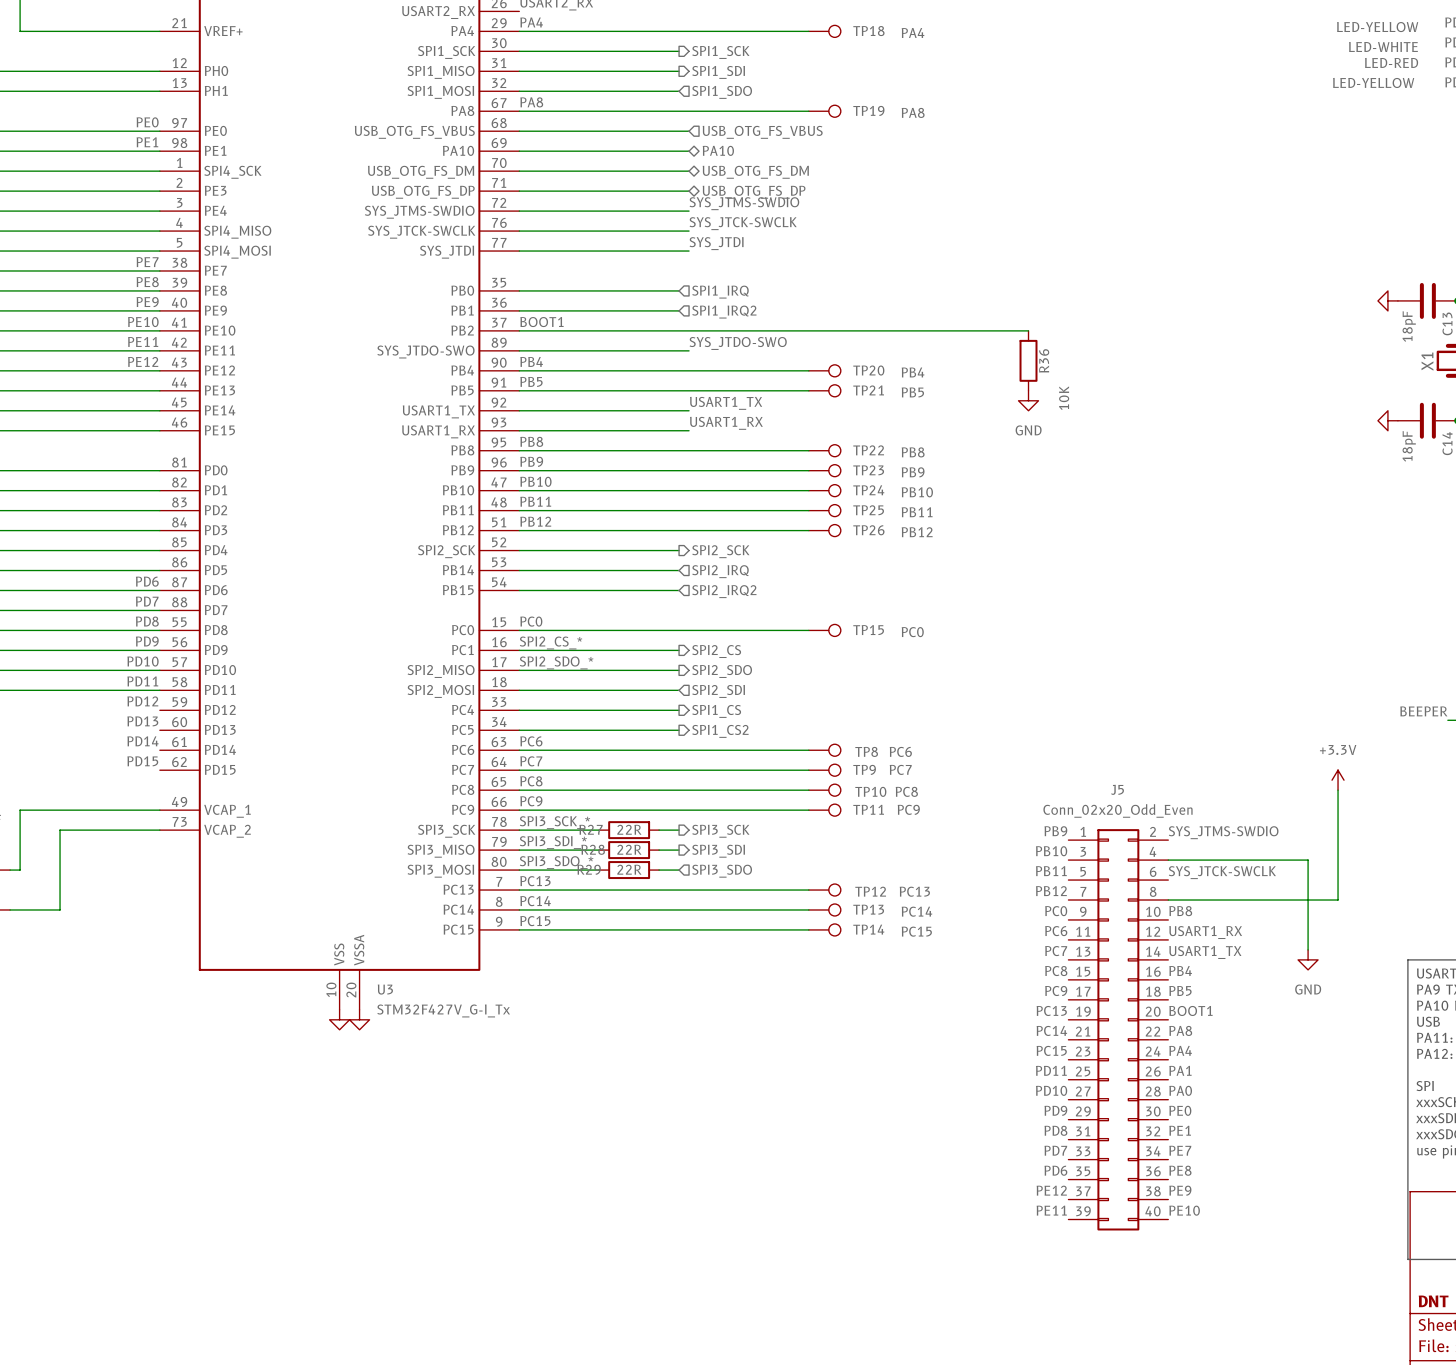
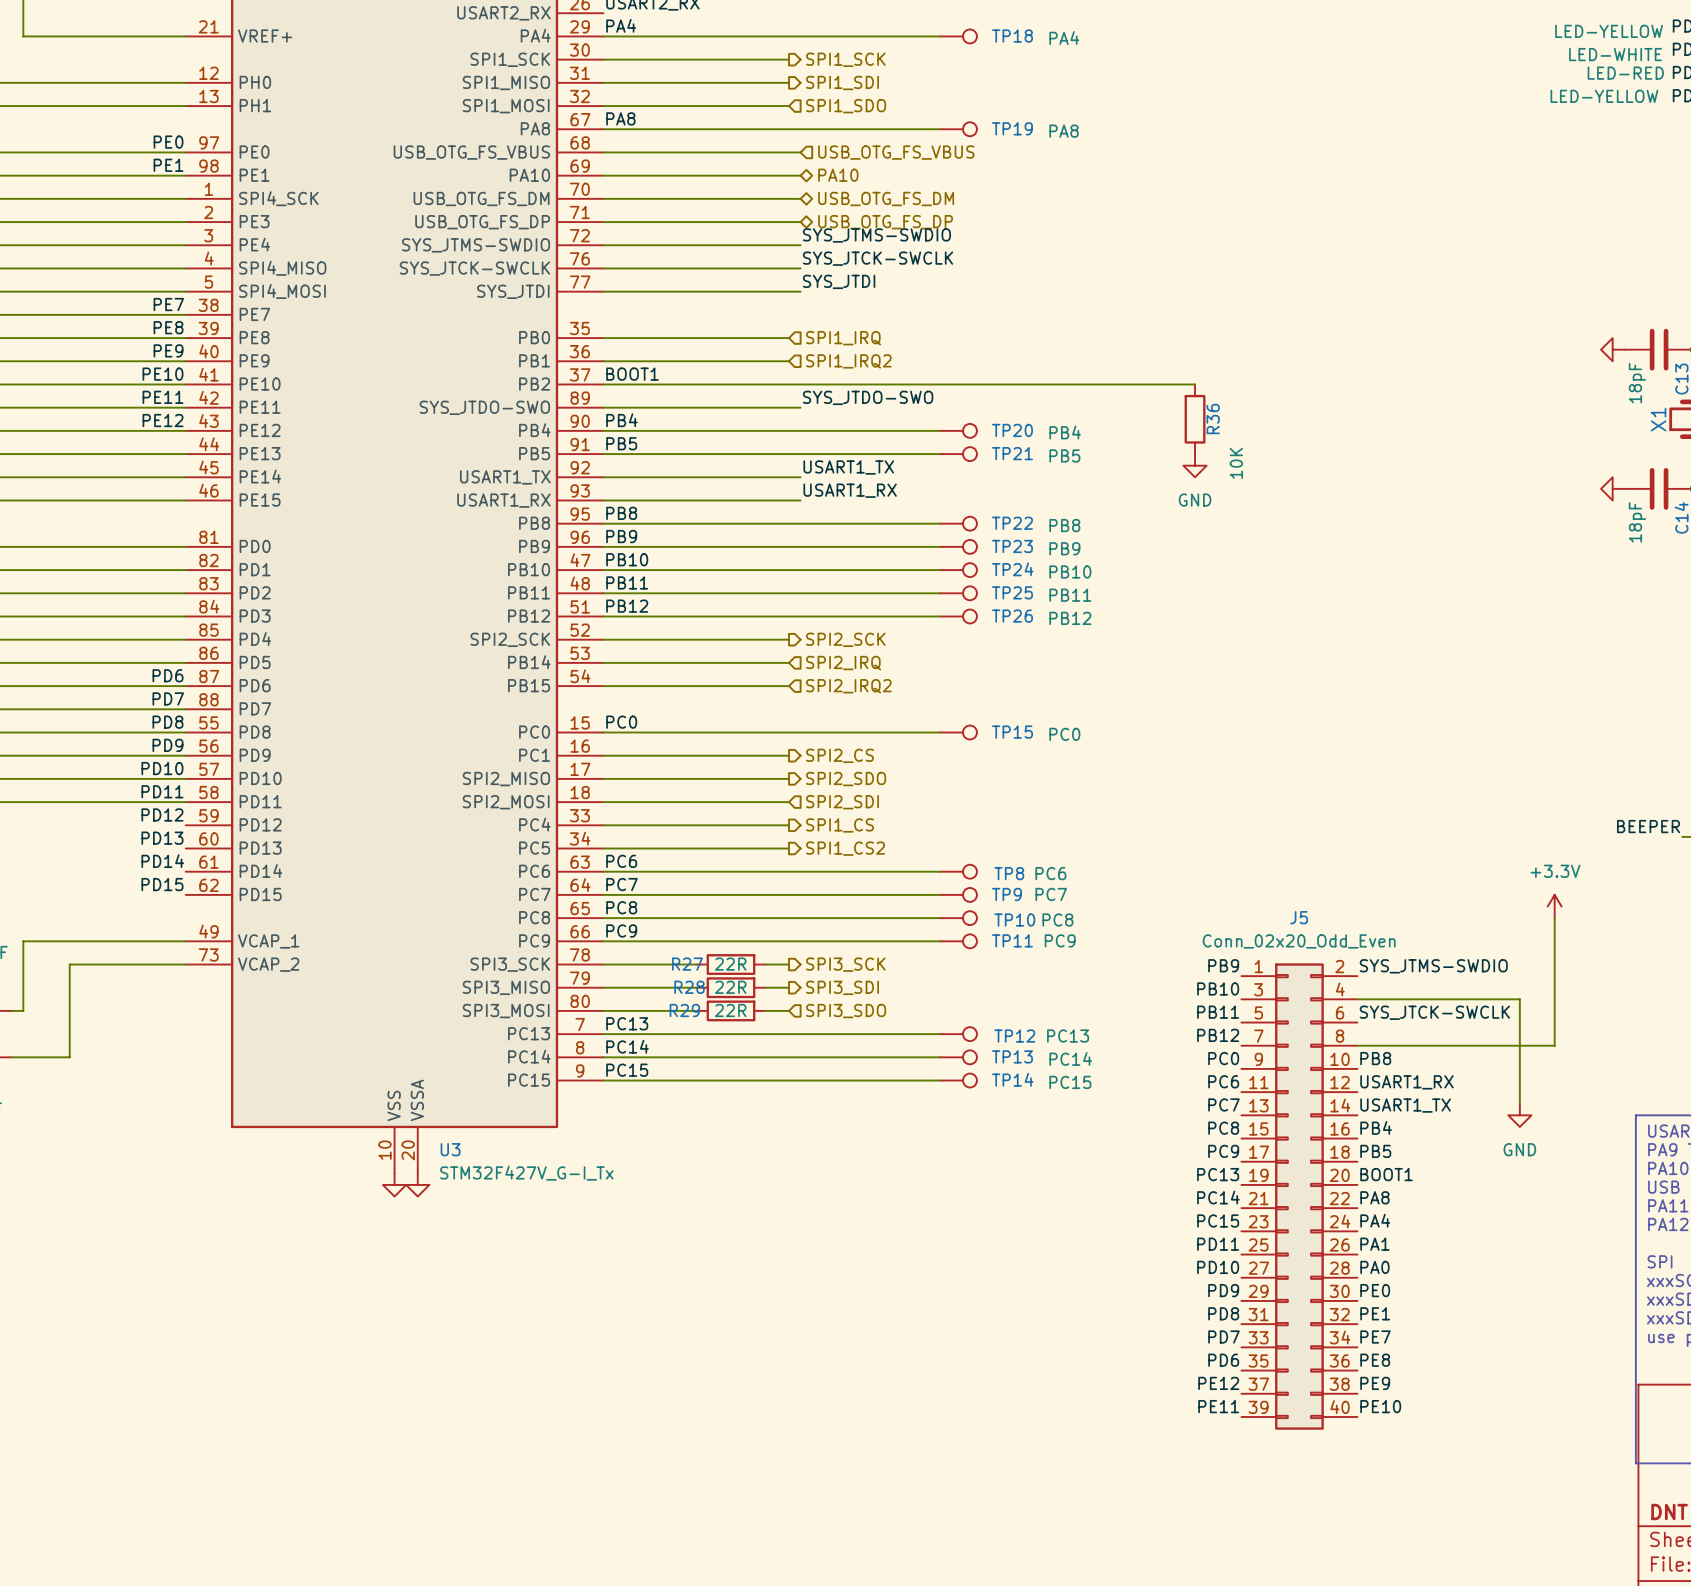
label: SPI2_CS_* (551, 642) -> none
label: SPI2_SDO_* (556, 662) -> none
label: SPI3_SCK_* (555, 822) -> none
label: SPI3_SDI_* (553, 842) -> none
label: SPI3_SDO_* (556, 862) -> none

